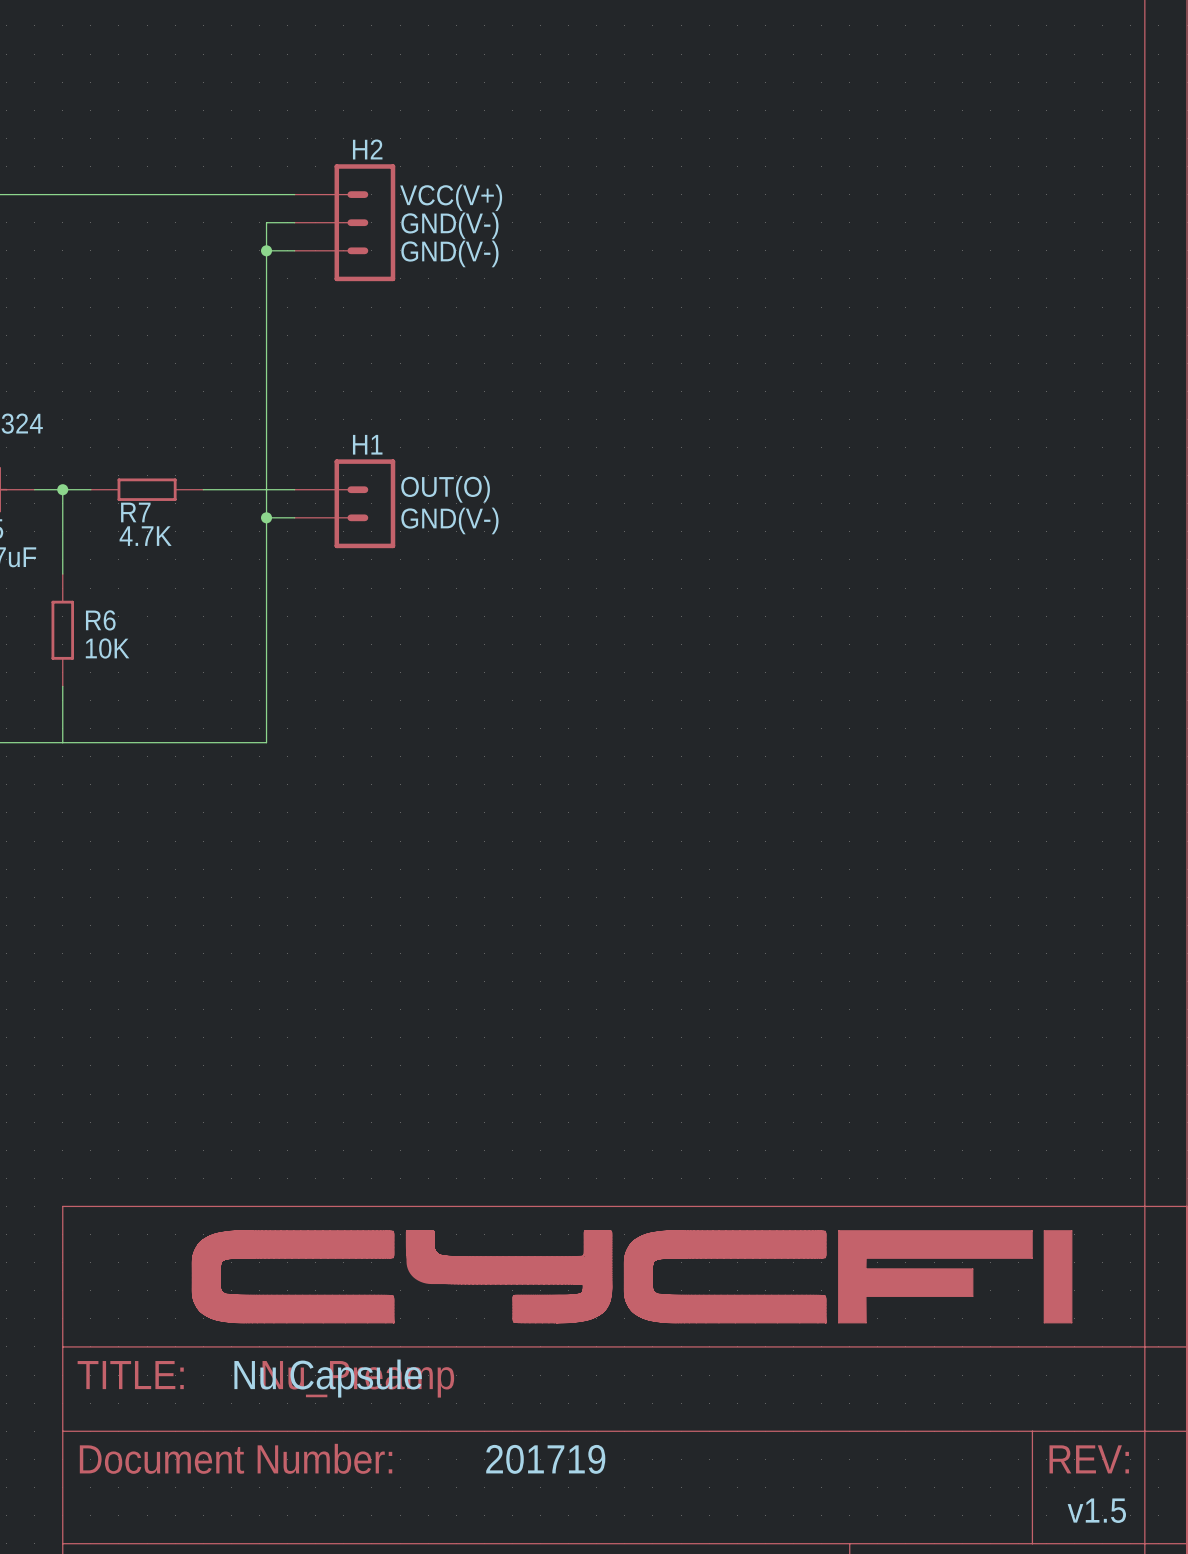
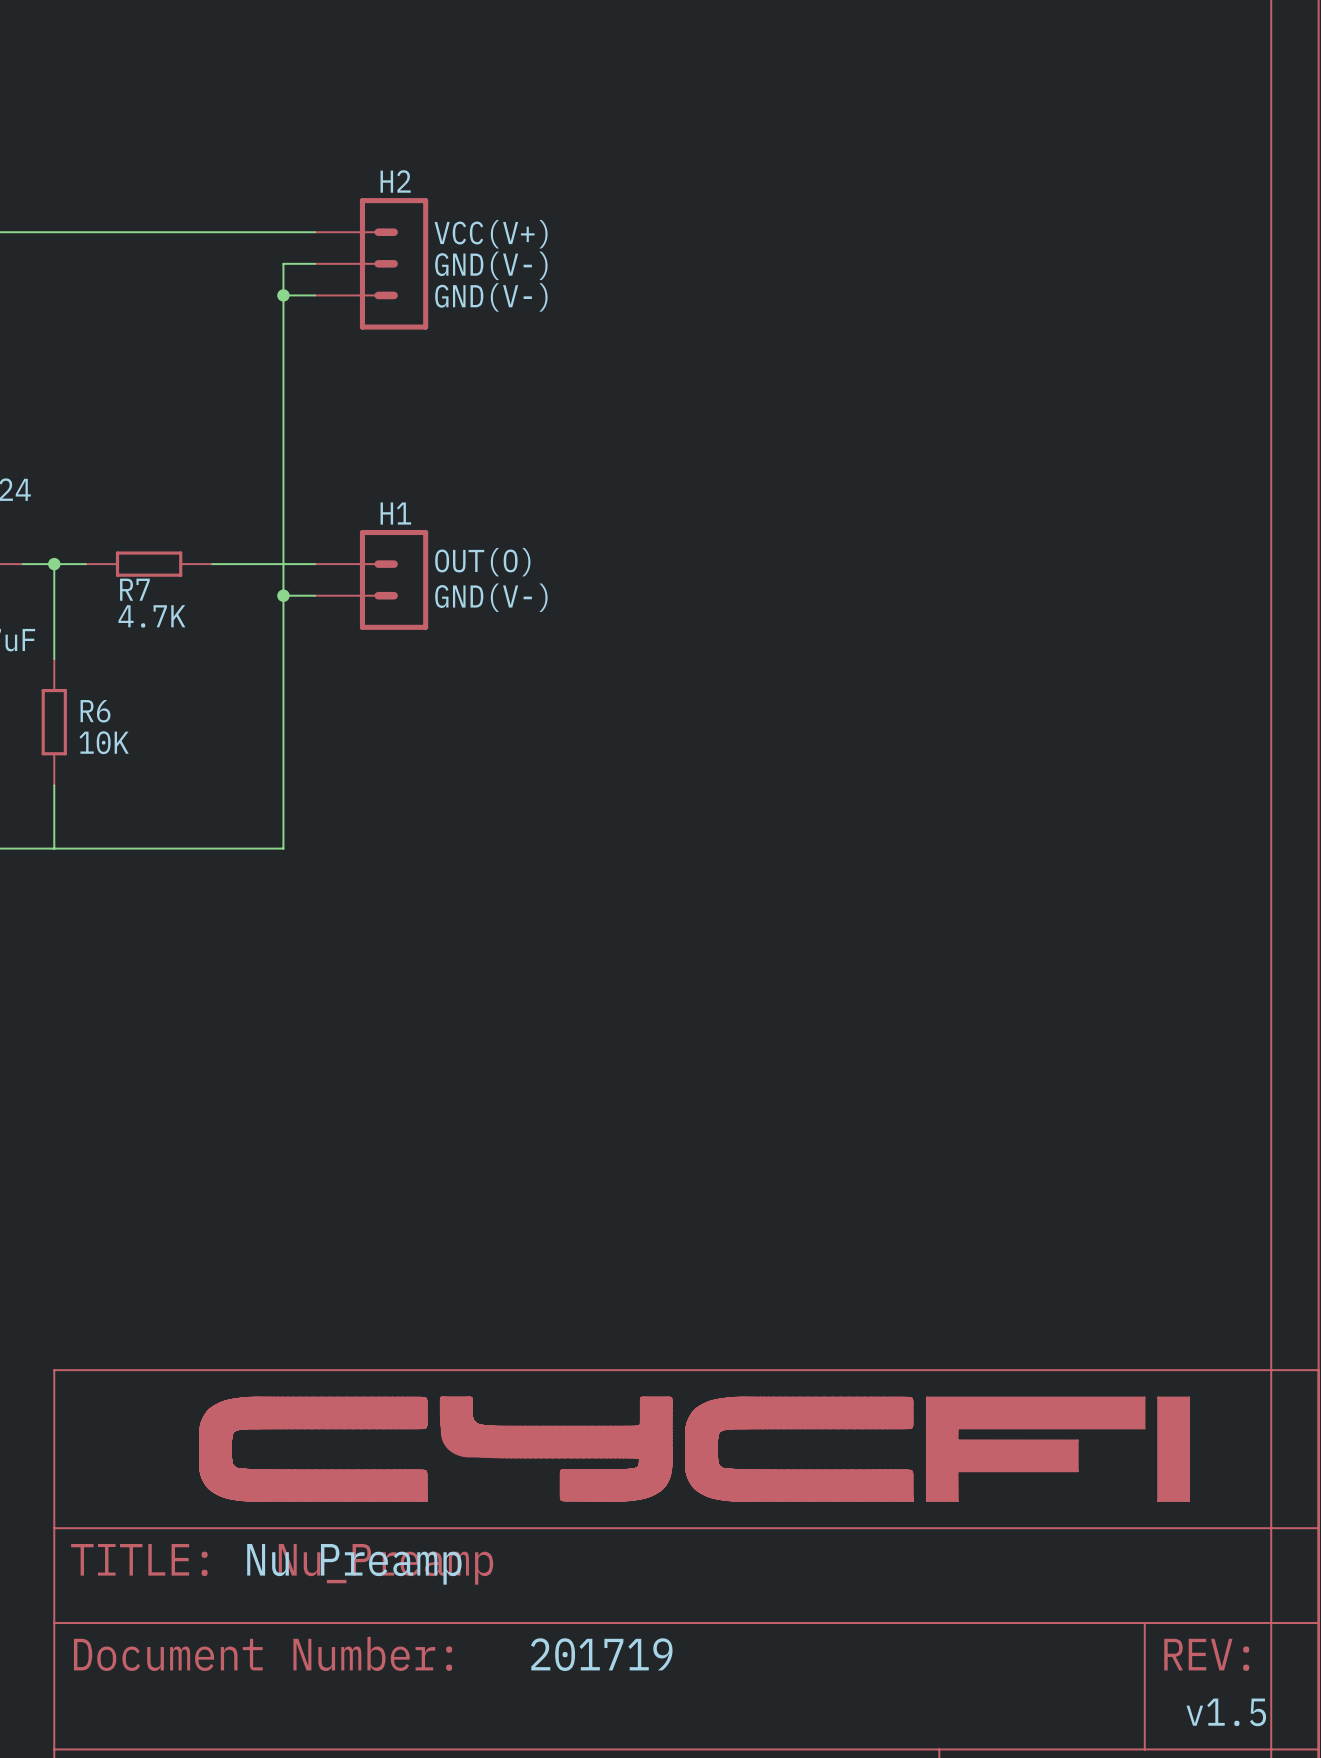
text: Nu Capsule (328, 1378) -> Nu Preamp (354, 1564)

